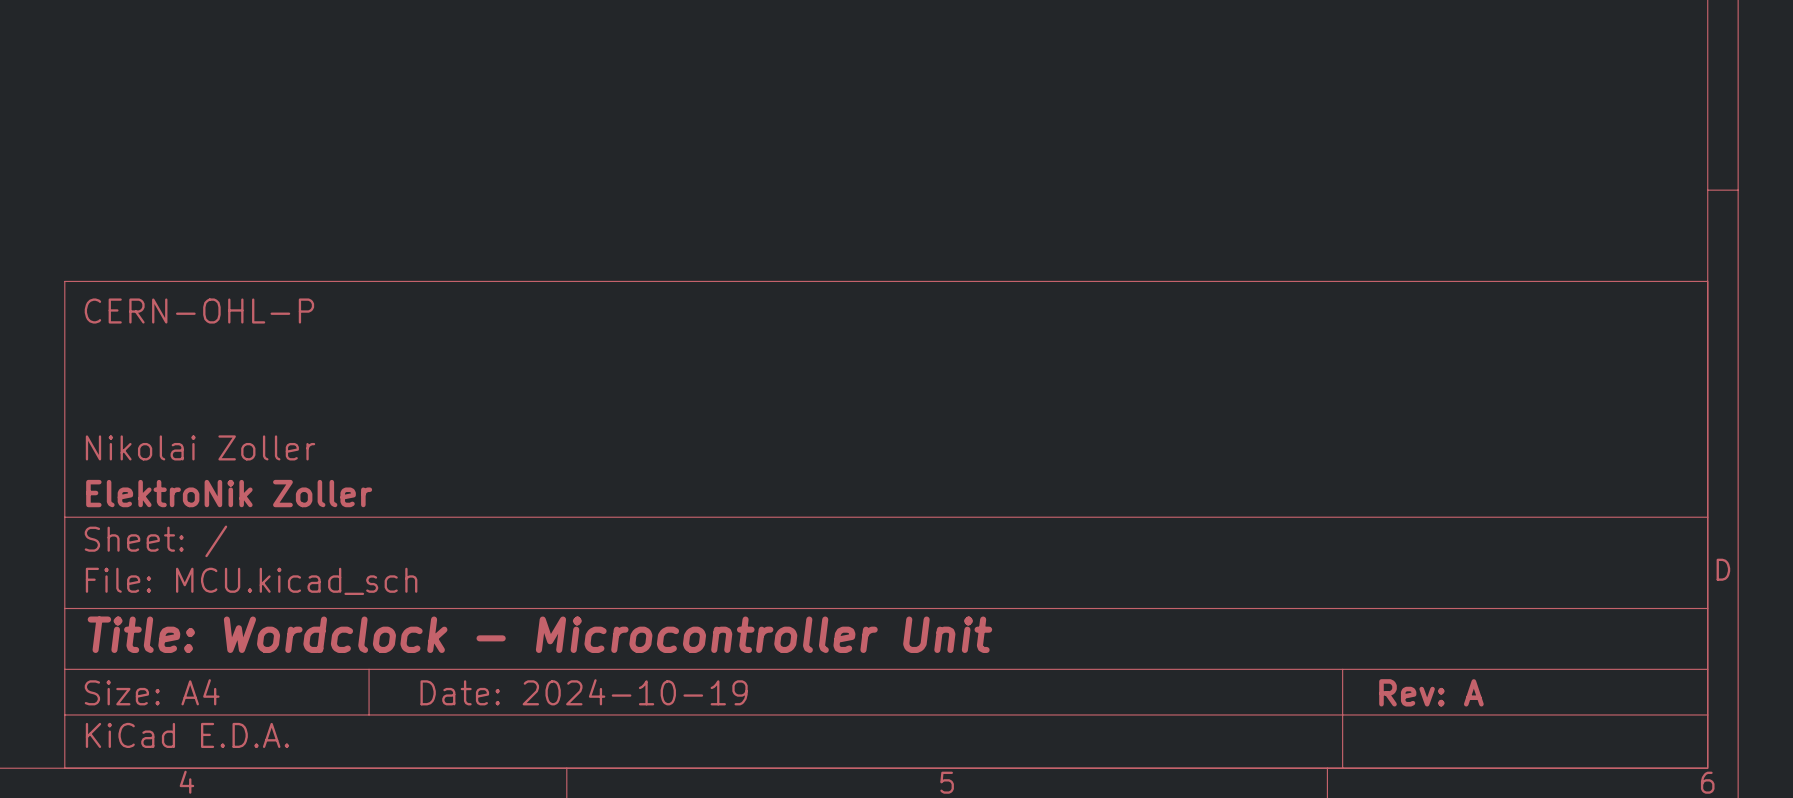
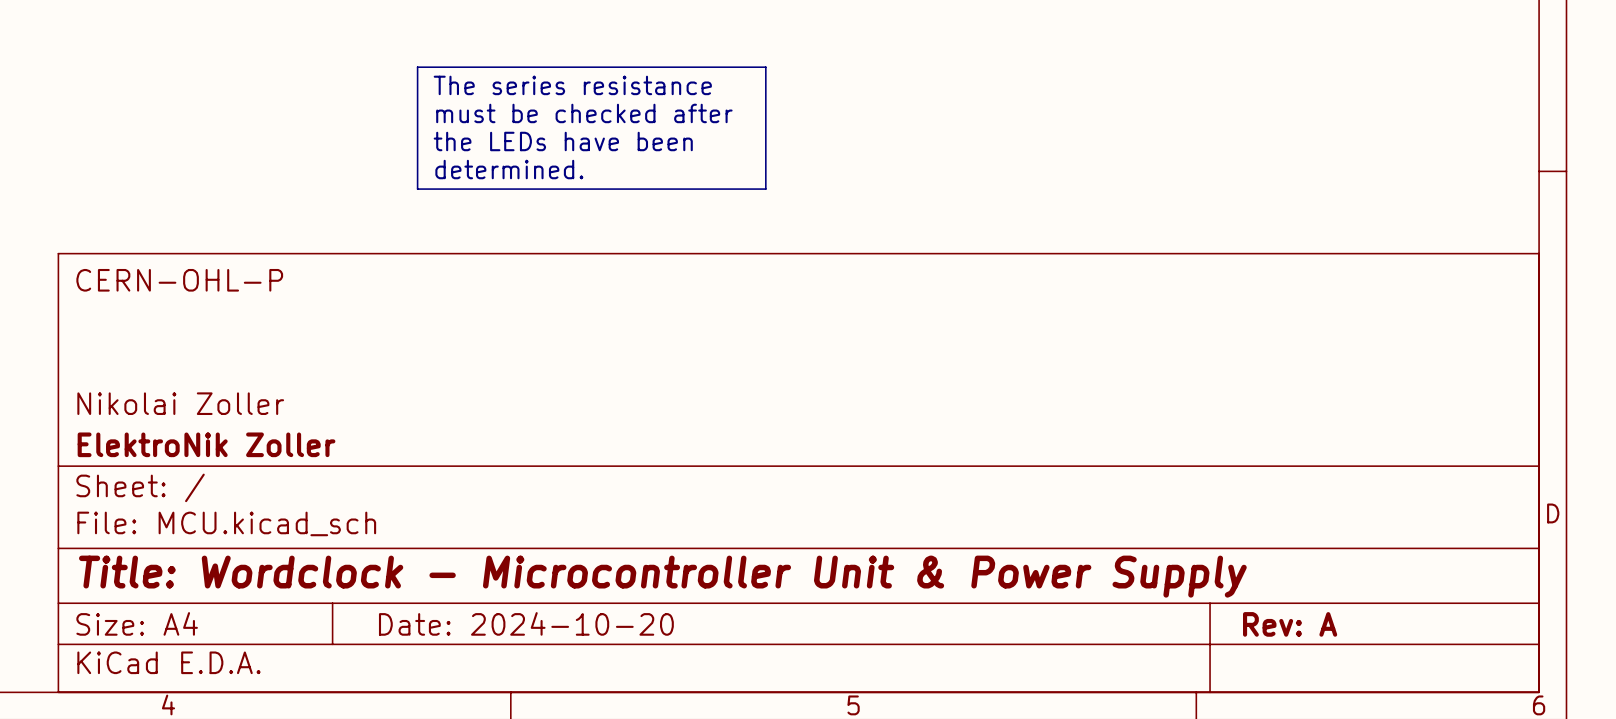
line: none -> (417, 67) (765, 67) (765, 189) (417, 189) (417, 67)
text: none -> The series resistance (572, 85)
text: none -> must be checked after (584, 113)
text: none -> the LEDs have been (563, 141)
text: none -> determined. (509, 169)
title block: Title: Wordclock - Microcontroller Unit (539, 634) -> Title: Wordclock - Microcontroller Unit & Power Supply (662, 576)
title block: Date: 2024-10-19 (584, 692) -> Date: 2024-10-20 (526, 623)

